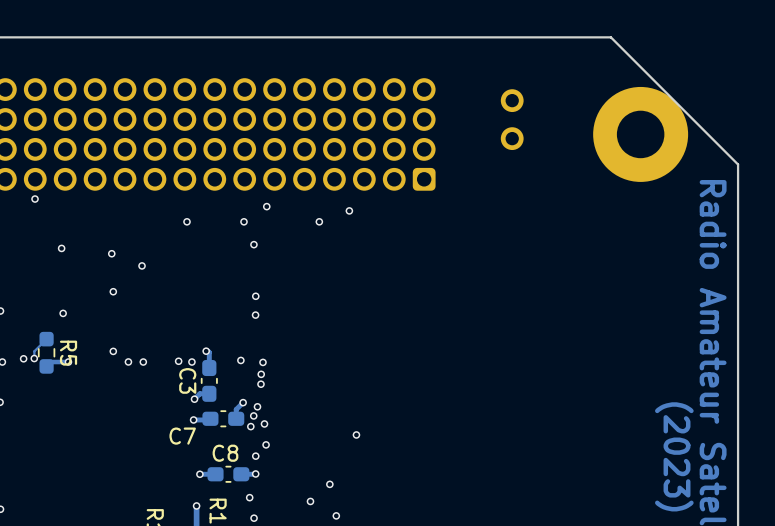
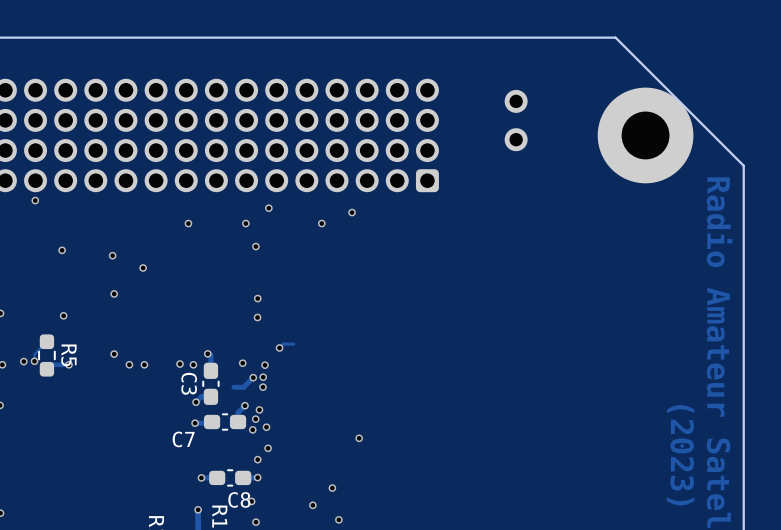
track: none -> (293, 344) (283, 344) (279, 347)
via: none -> (279, 347)
track: none -> (253, 377) (243, 387) (233, 387)
via: none -> (253, 377)
C8 name position: C8 (225, 453) -> C8 (239, 499)

